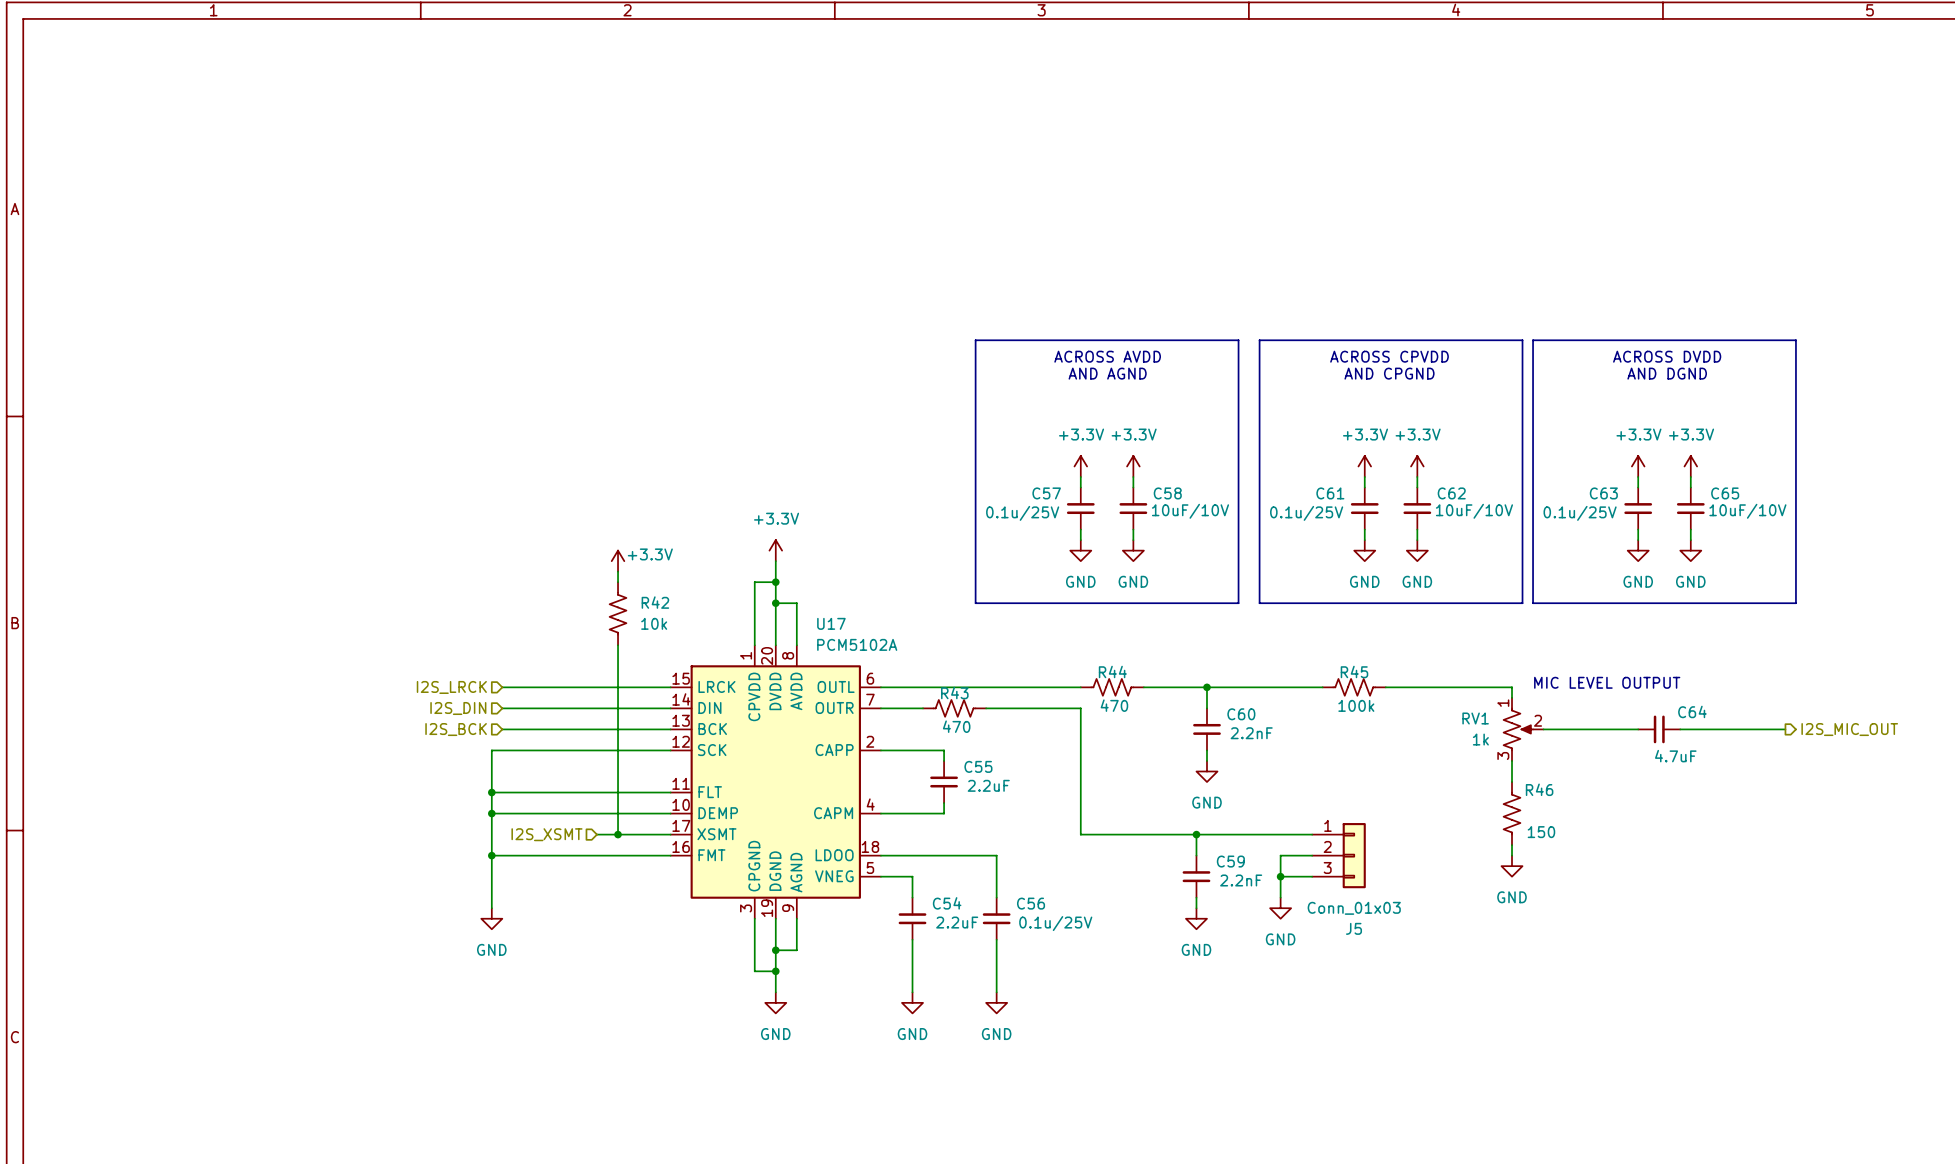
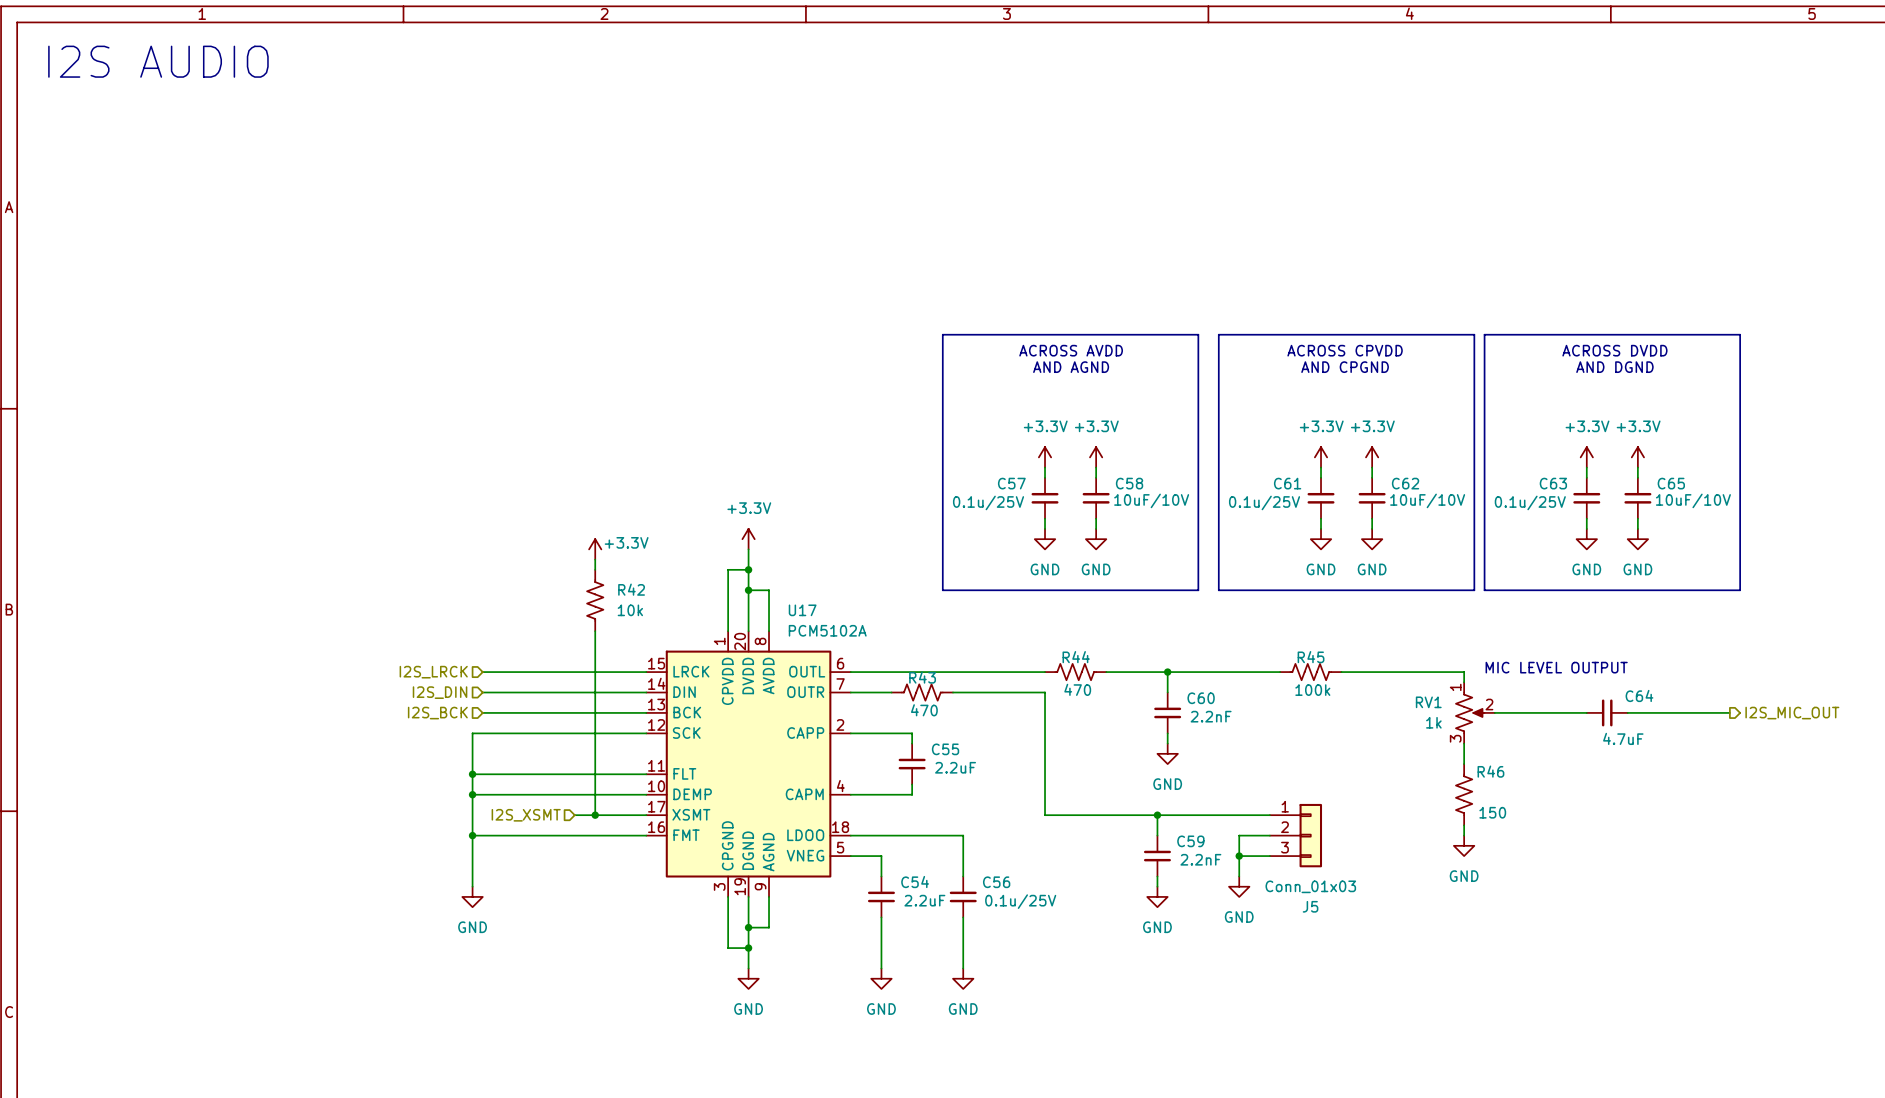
text: none -> I2S AUDIO (158, 61)

